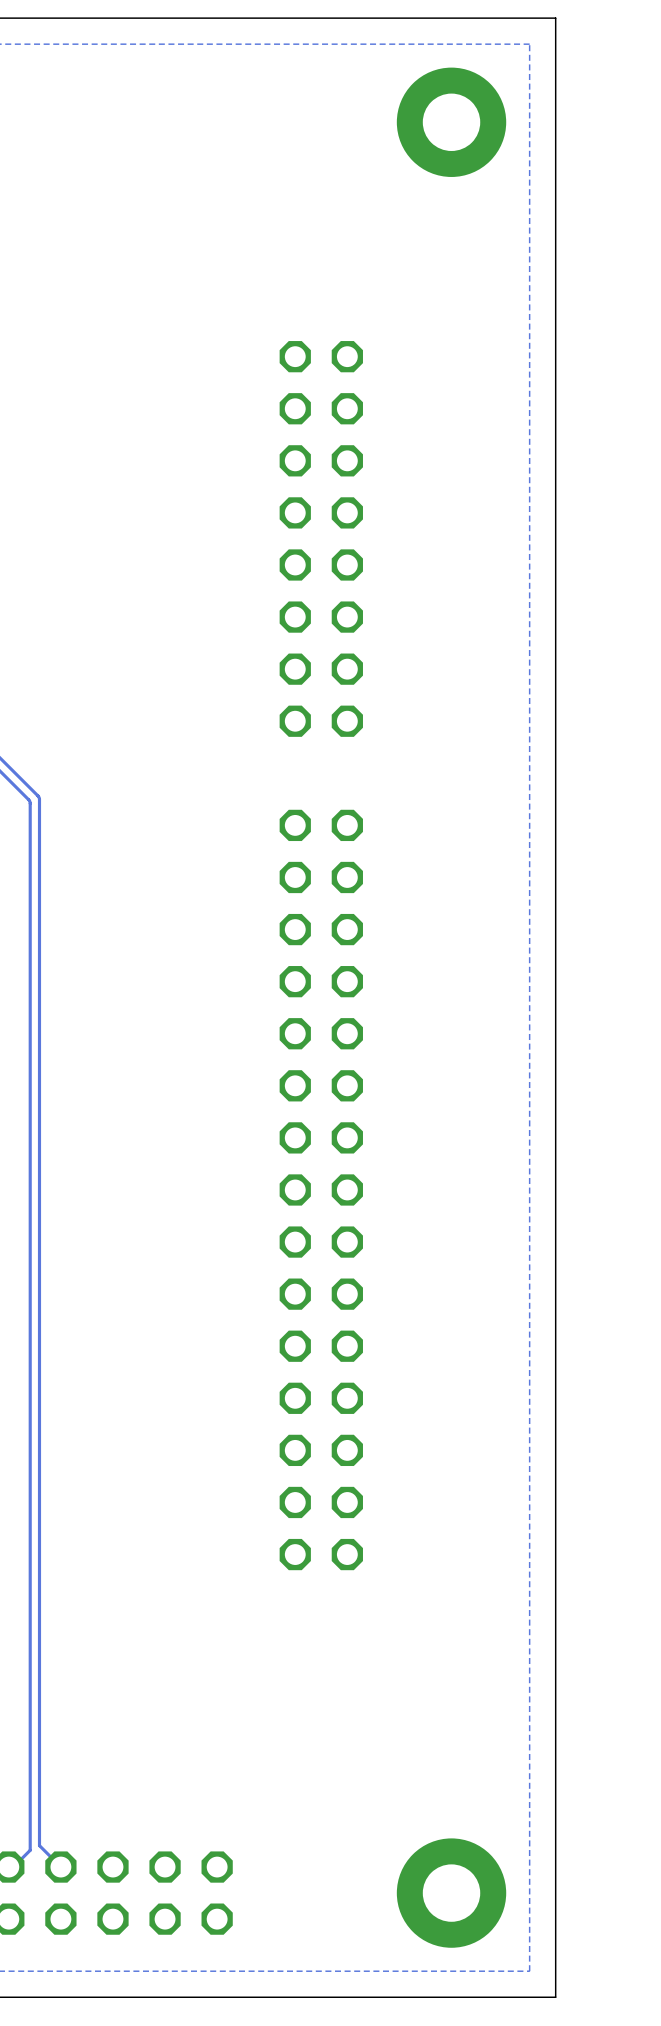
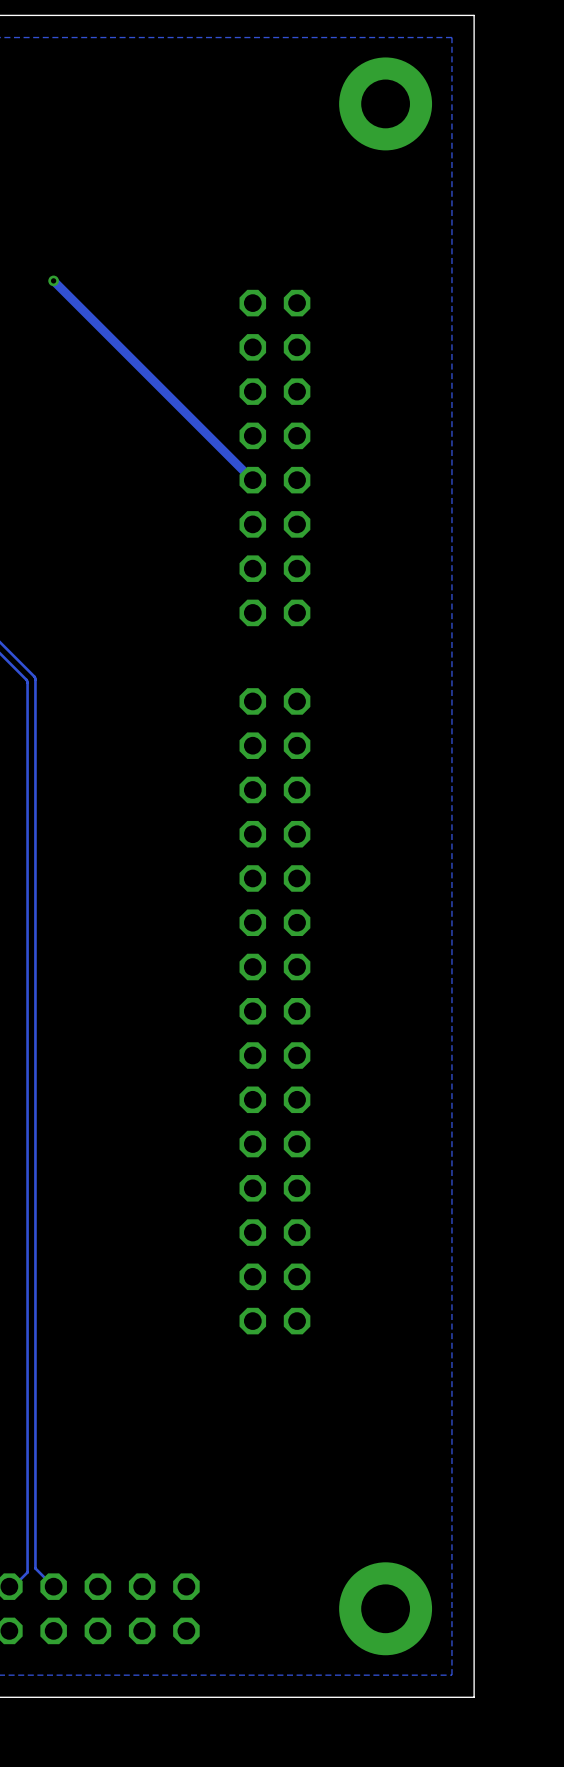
track: none -> (53, 280) (252, 480)
via: none -> (53, 280)

